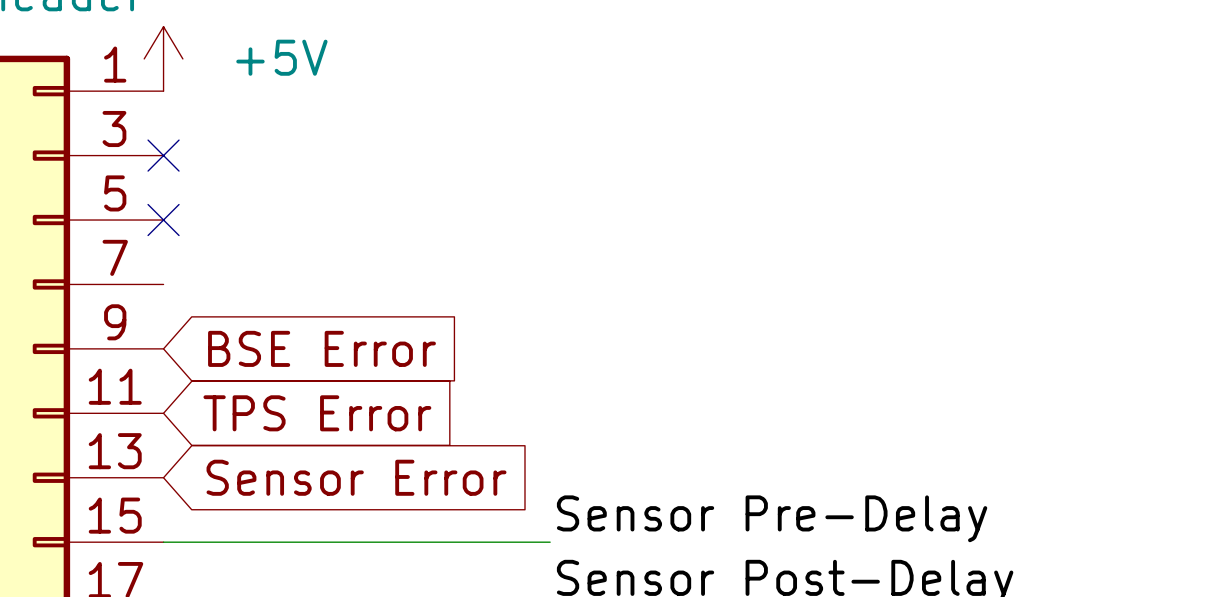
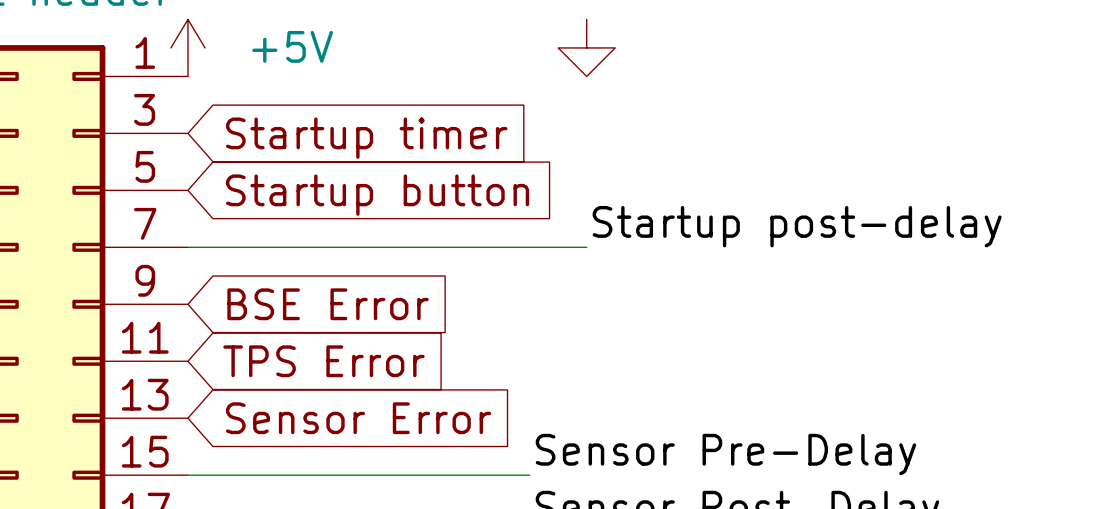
power symbol: none -> (586, 47)
no-connect mark: (163, 155) -> none
global label: none -> Startup timer (366, 138)
no-connect mark: (163, 220) -> none
global label: none -> Startup button (377, 195)
label: none -> Startup post-delay (797, 226)
wire: none -> (187, 247) (586, 247)

